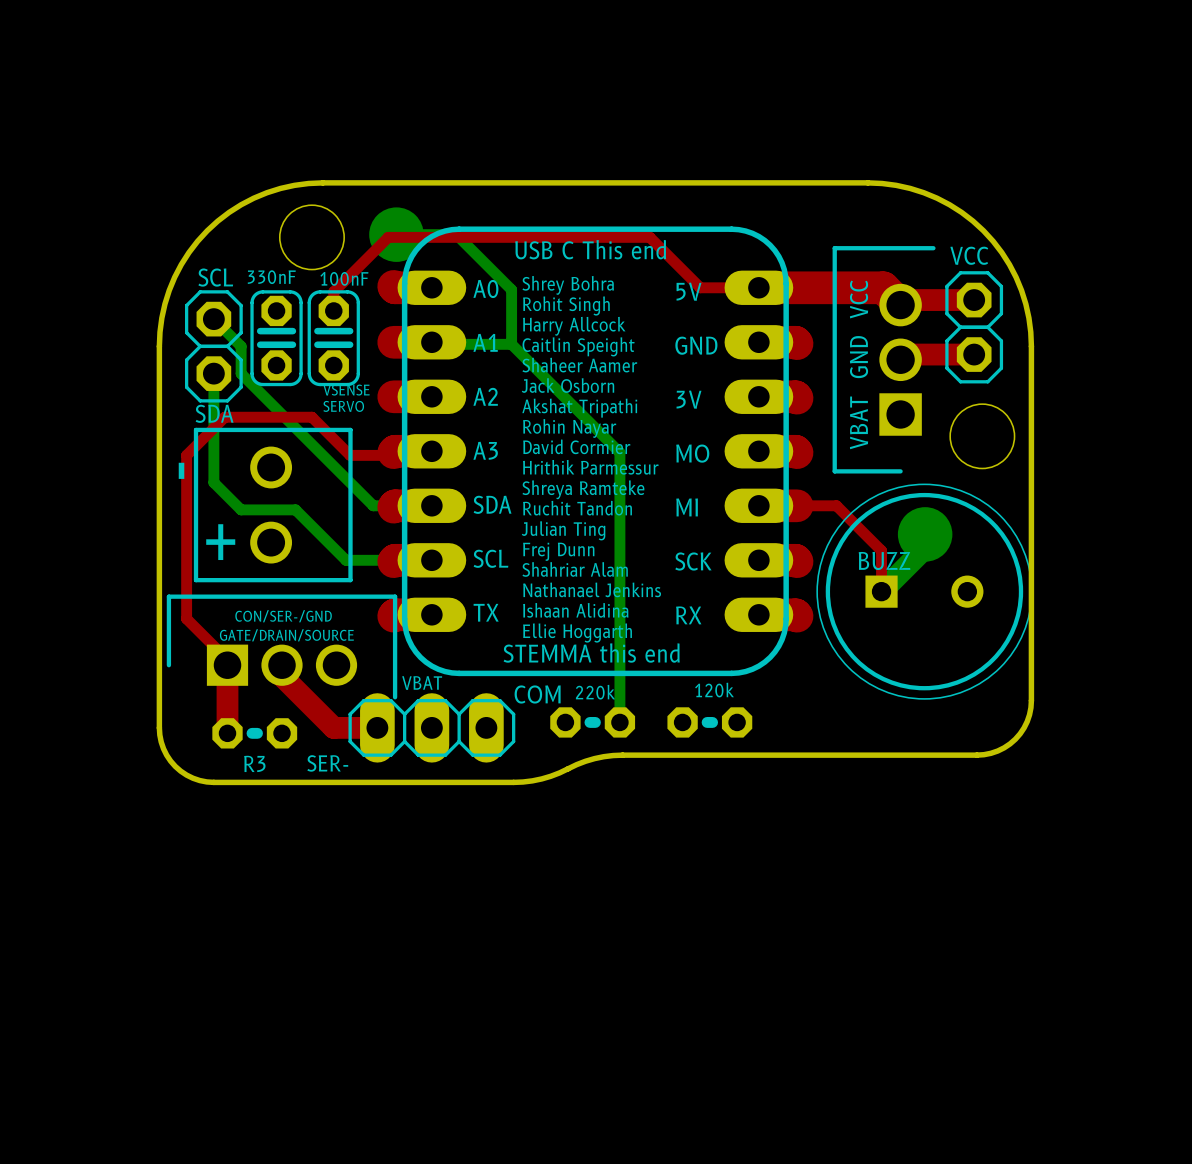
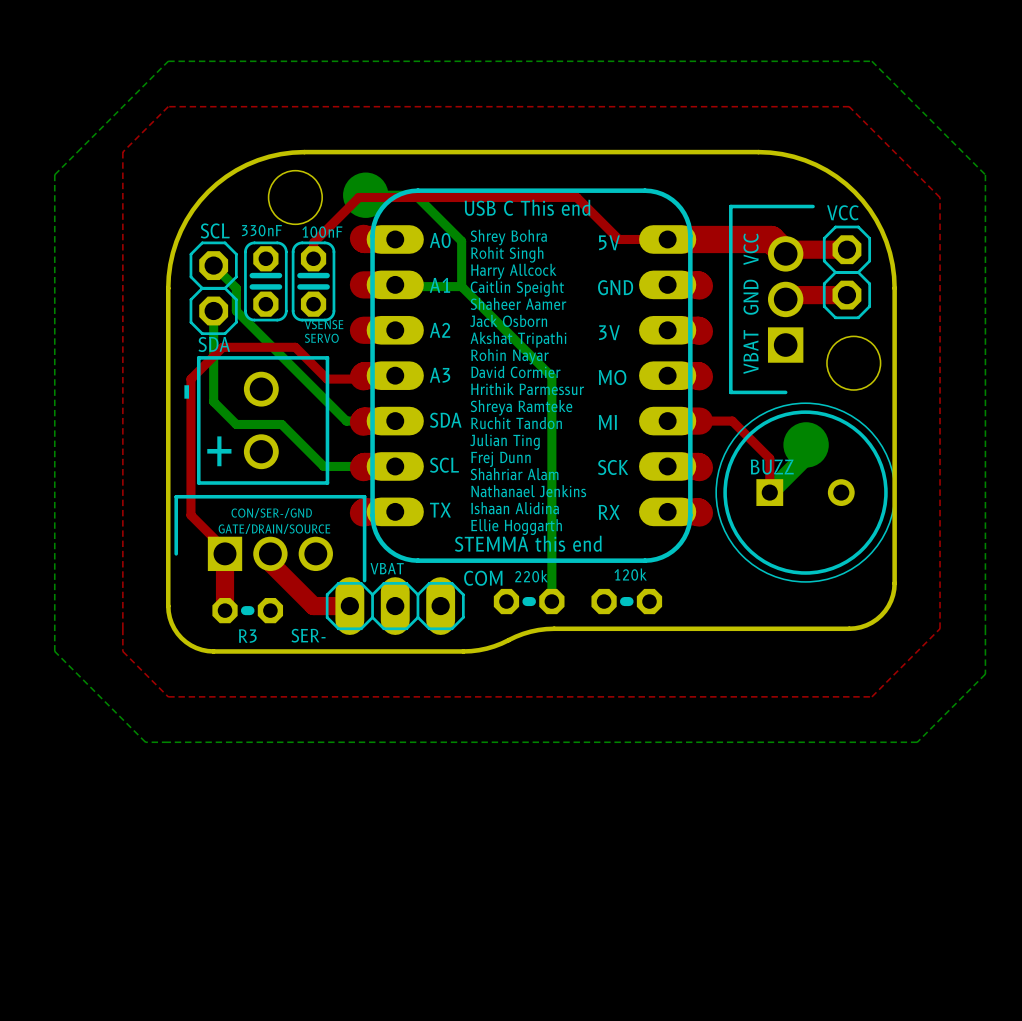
bottom zone outline: none -> (168, 61) (54, 174) (54, 651) (145, 742) (917, 742) (985, 674) (985, 174) (871, 61) (168, 61)
top zone outline: none -> (168, 106) (122, 152) (122, 651) (168, 696) (871, 696) (940, 628) (940, 197) (849, 106) (168, 106)

